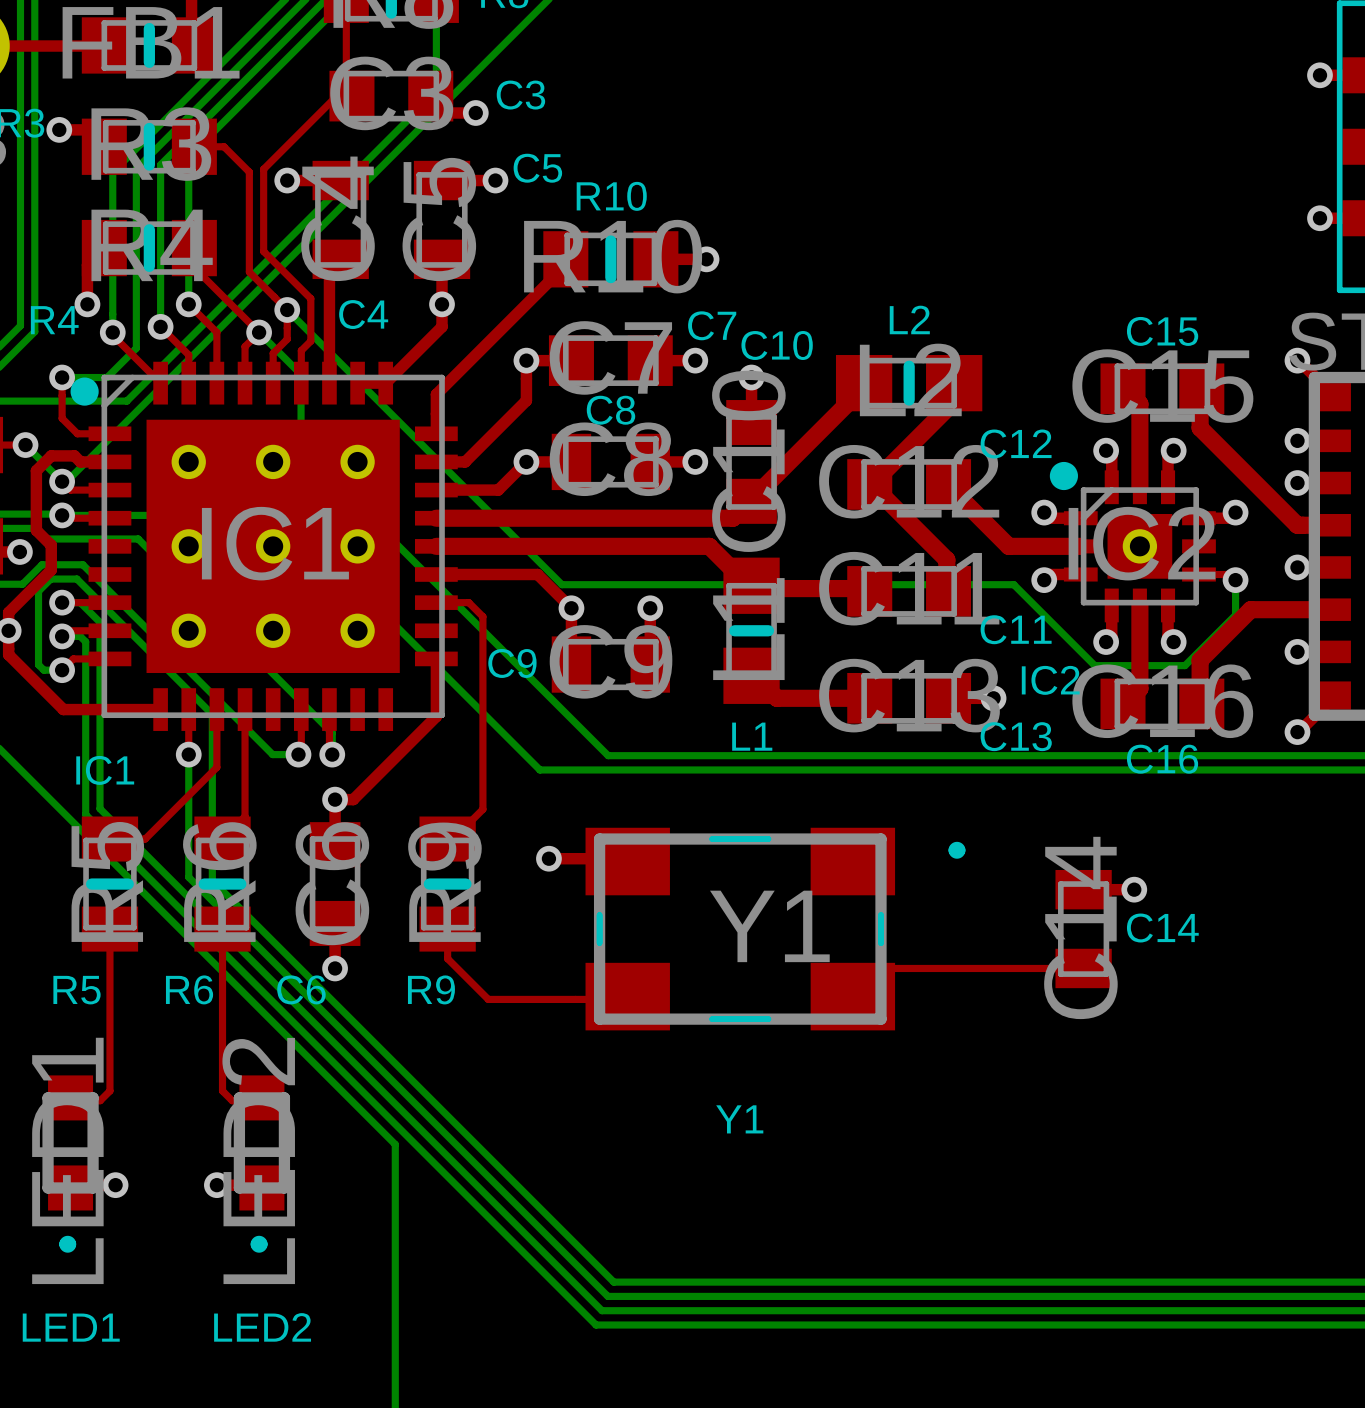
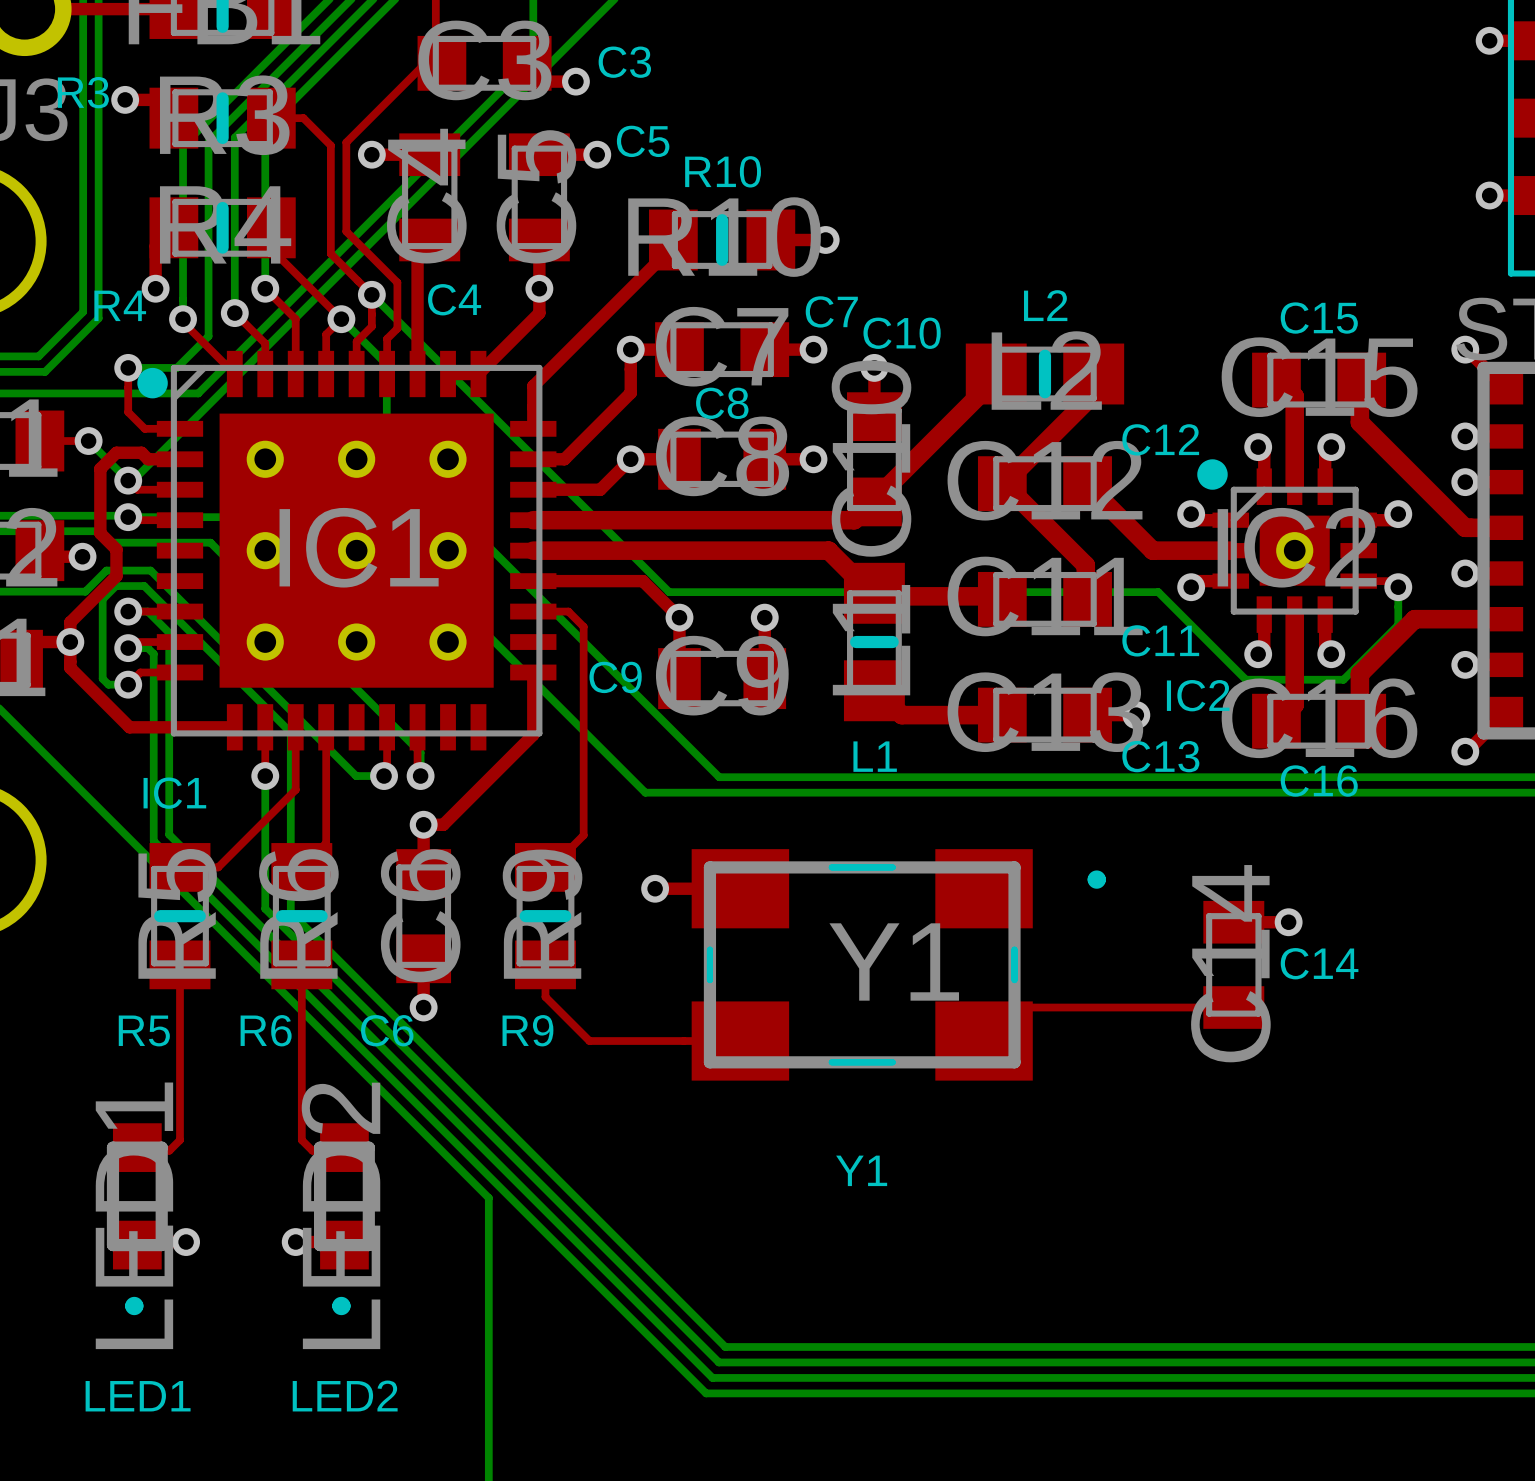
Y1 footprint: [585, 827, 966, 1031] -> [691, 849, 1106, 1081]

